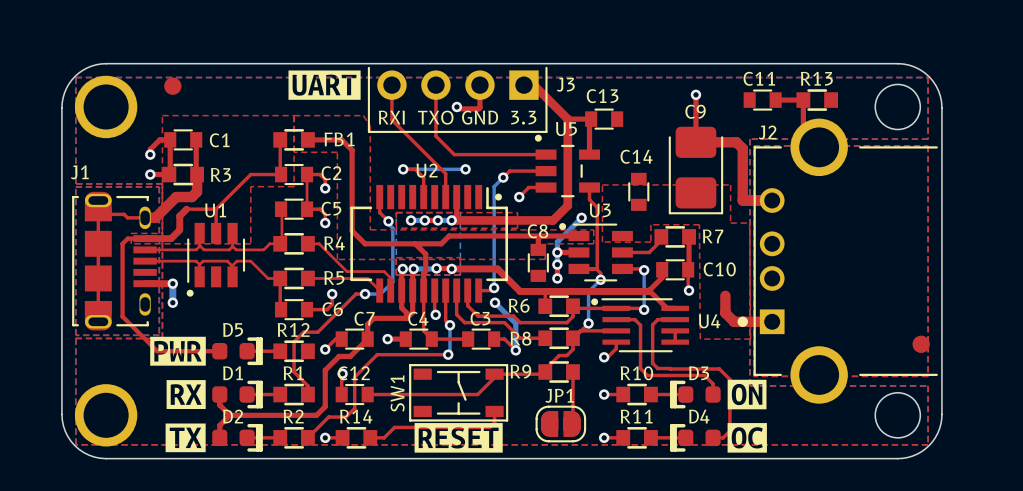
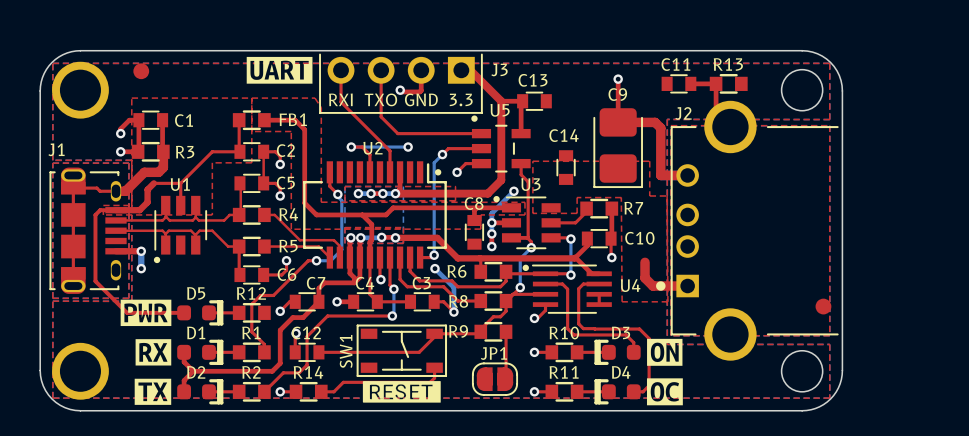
drawing shape: [414, 423, 503, 453] -> [362, 381, 441, 403]

